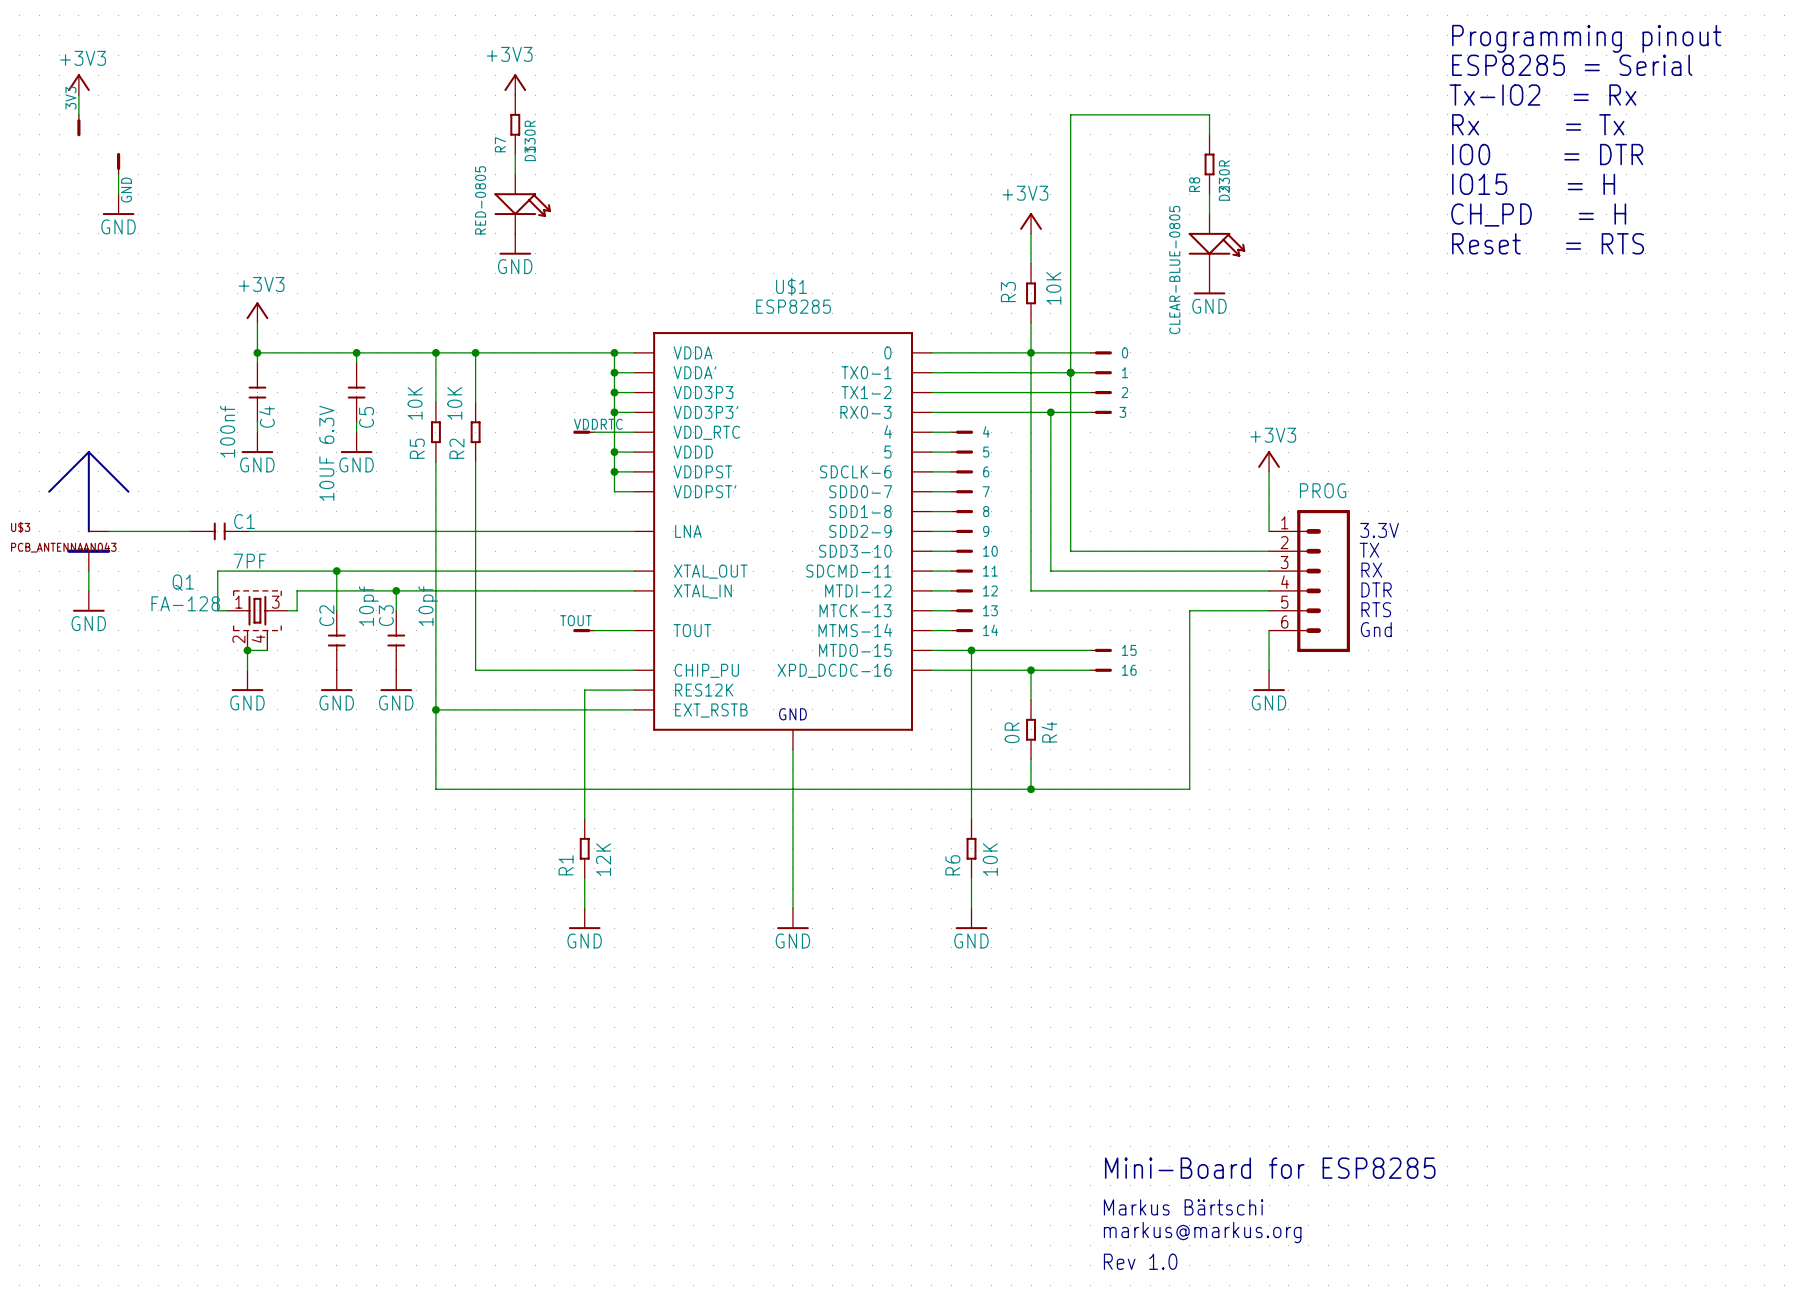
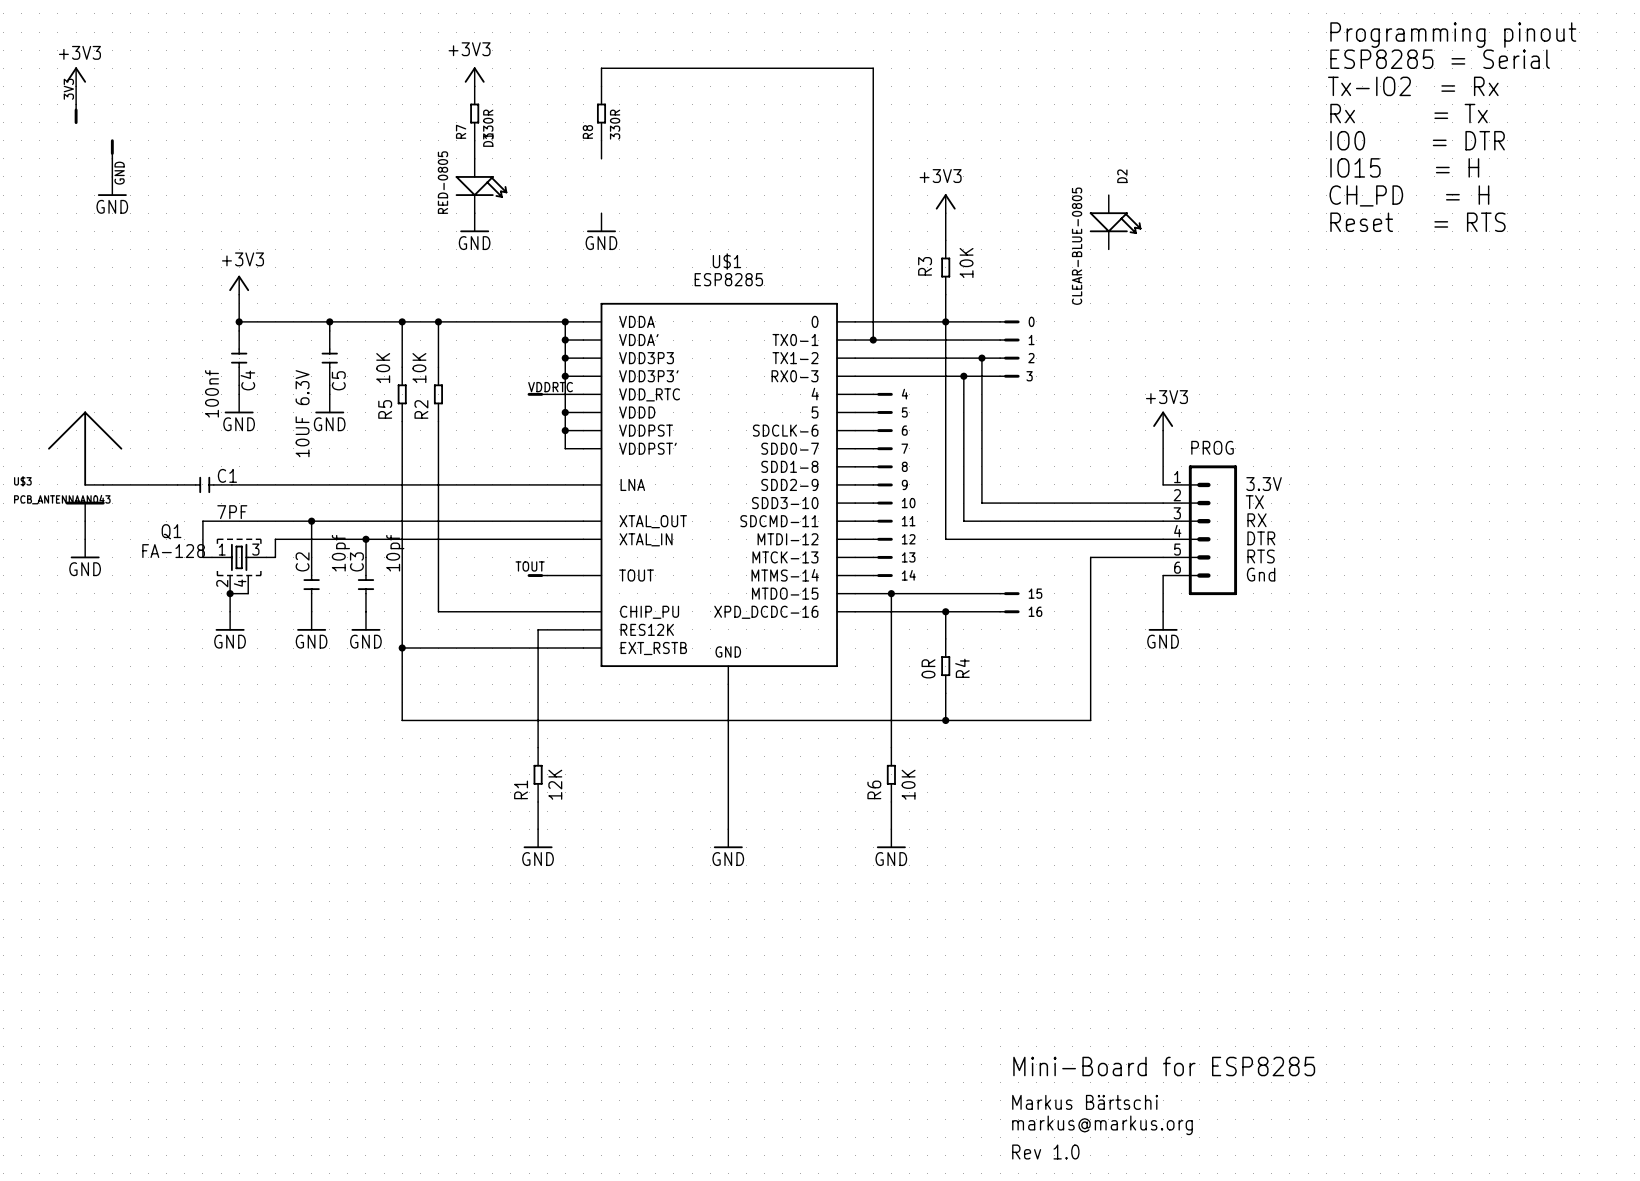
wire: none -> (601, 86) (601, 68) (873, 68) (873, 340)
wire: (1209, 134) (1209, 114) (1070, 114) (1070, 392) -> none
wire: none -> (601, 140) (601, 158)
R8 position: (1209, 164) -> (601, 113)
wire: (1209, 194) (1209, 214) -> none
power symbol: none -> GND (601, 222)
power symbol: GND (1209, 283) -> none
junction: none -> (873, 340)
junction position: (1070, 372) -> (981, 358)

